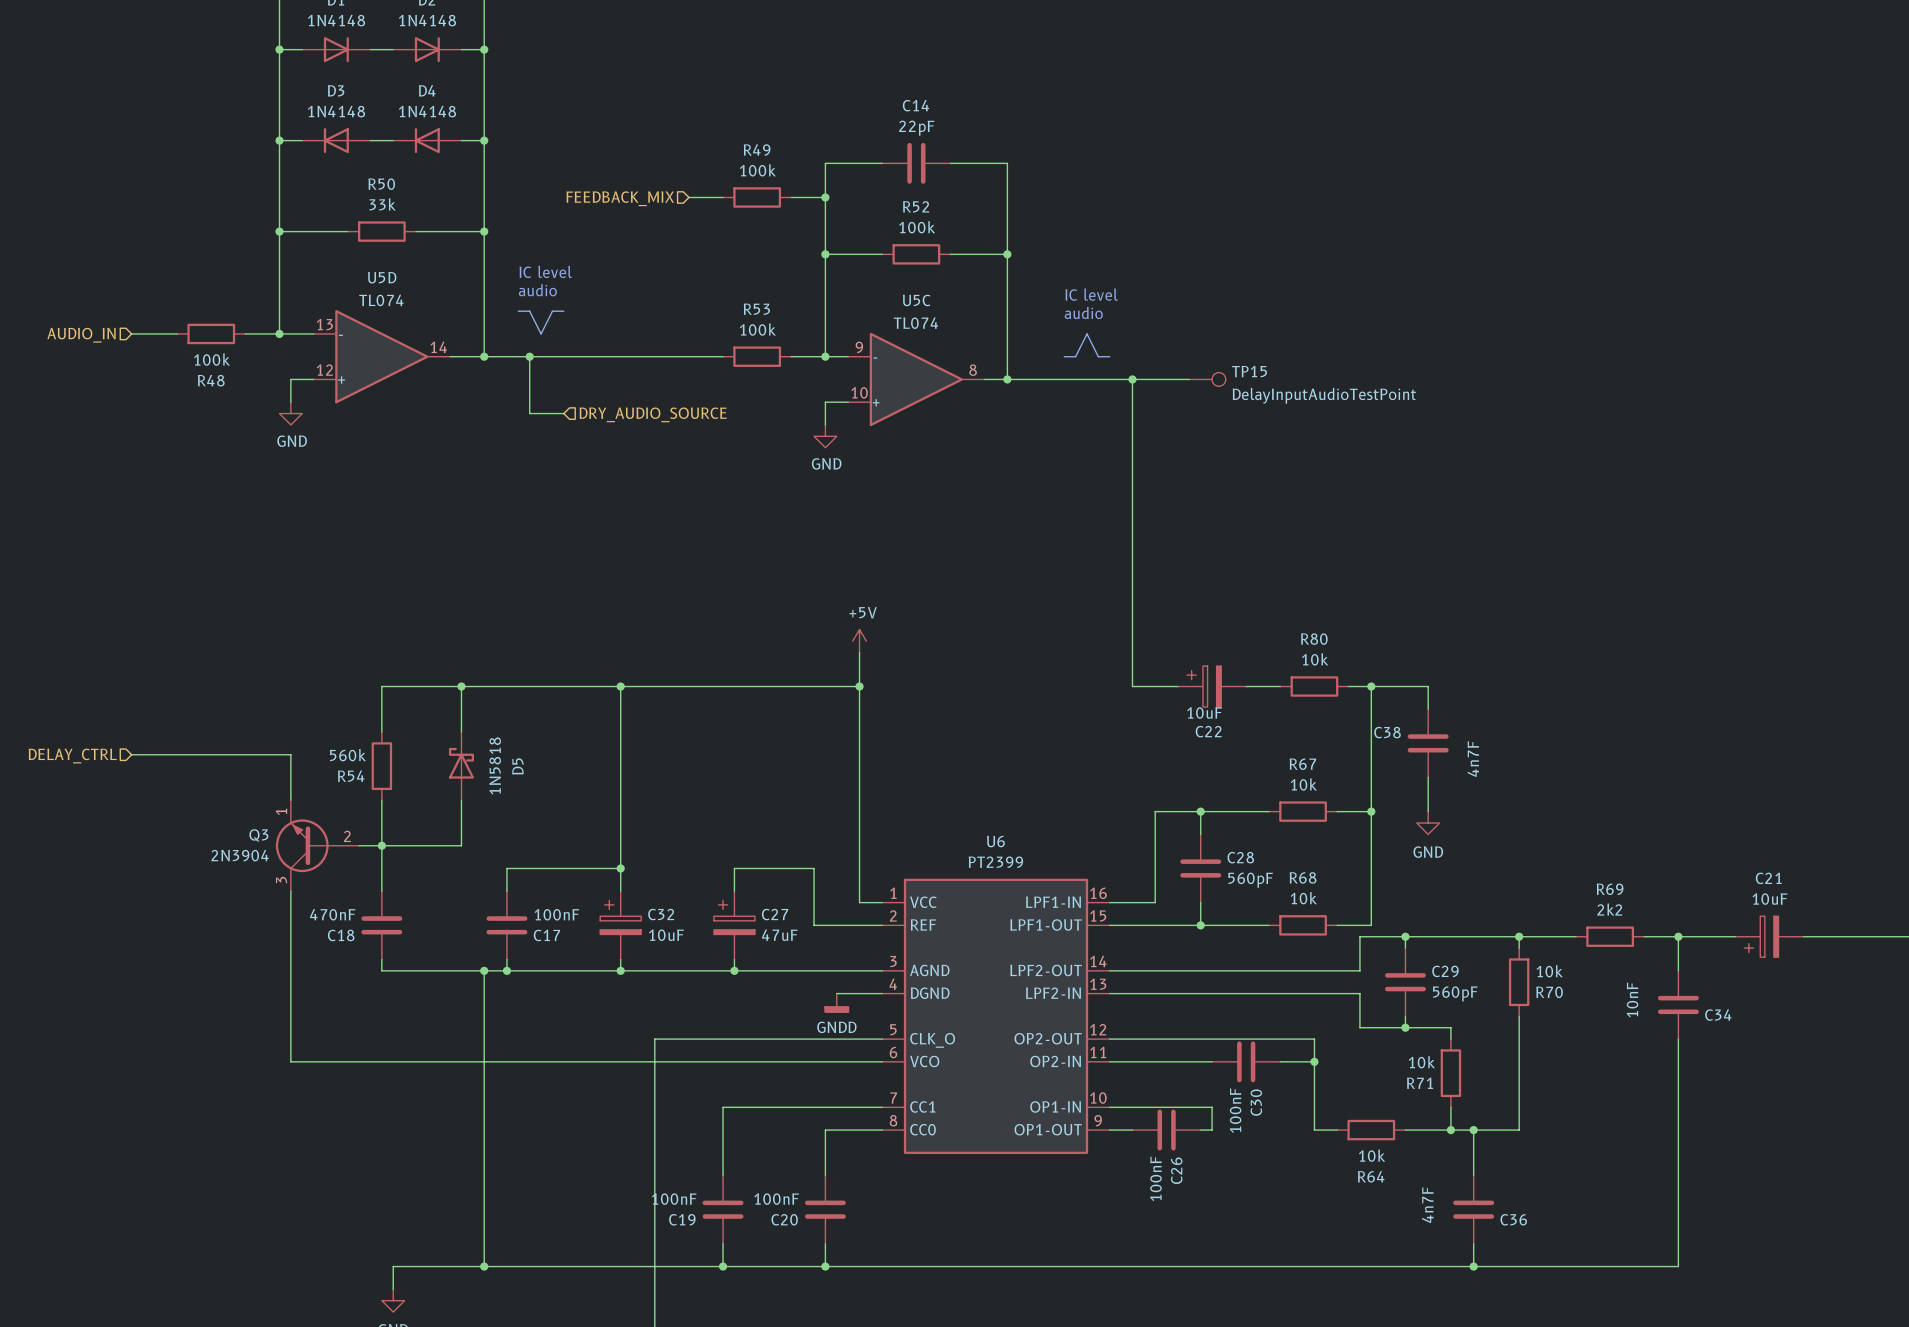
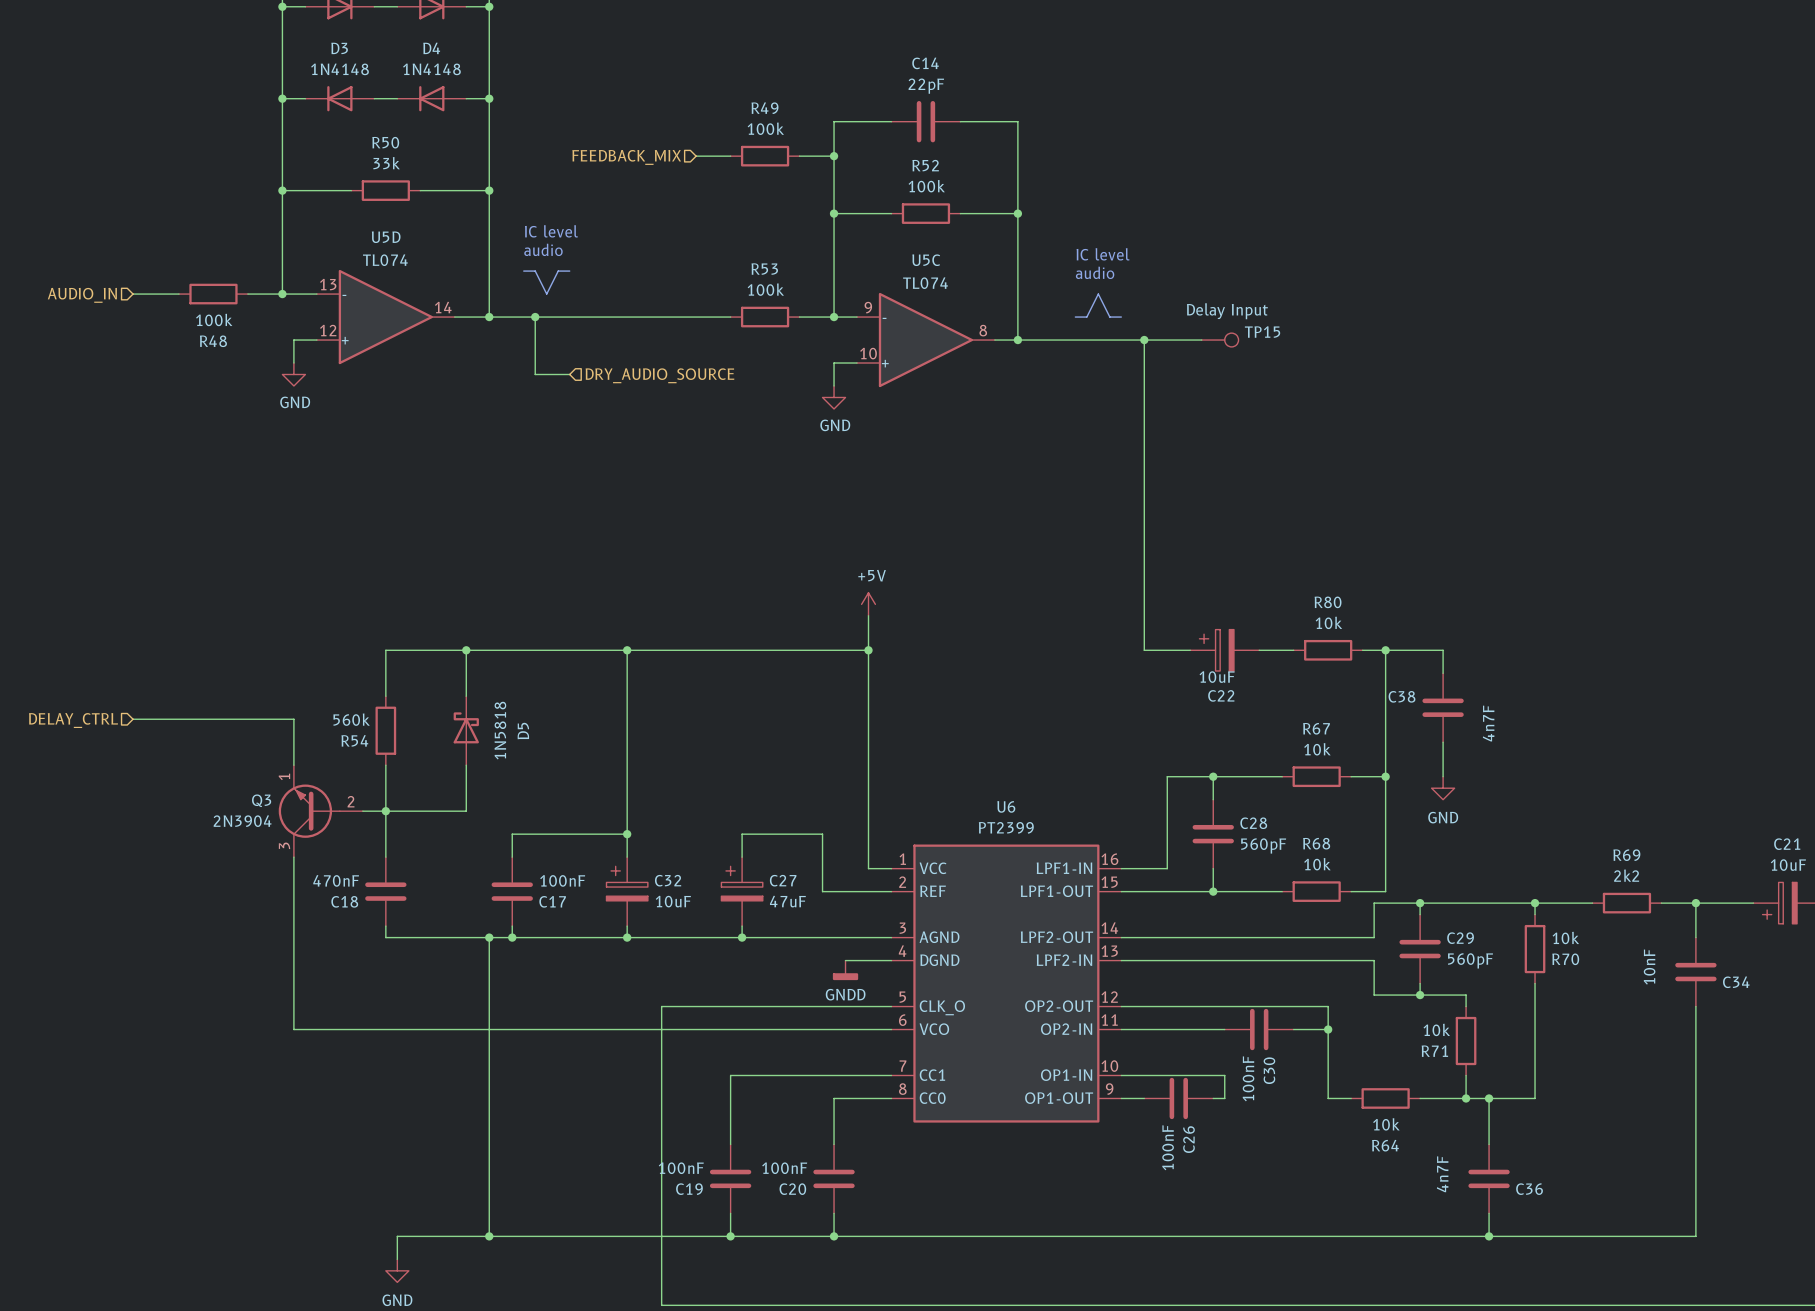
TP15 text: none -> Delay Input (1227, 311)
TP15 value: DelayInputAudioTestPoint (1324, 395) -> none

